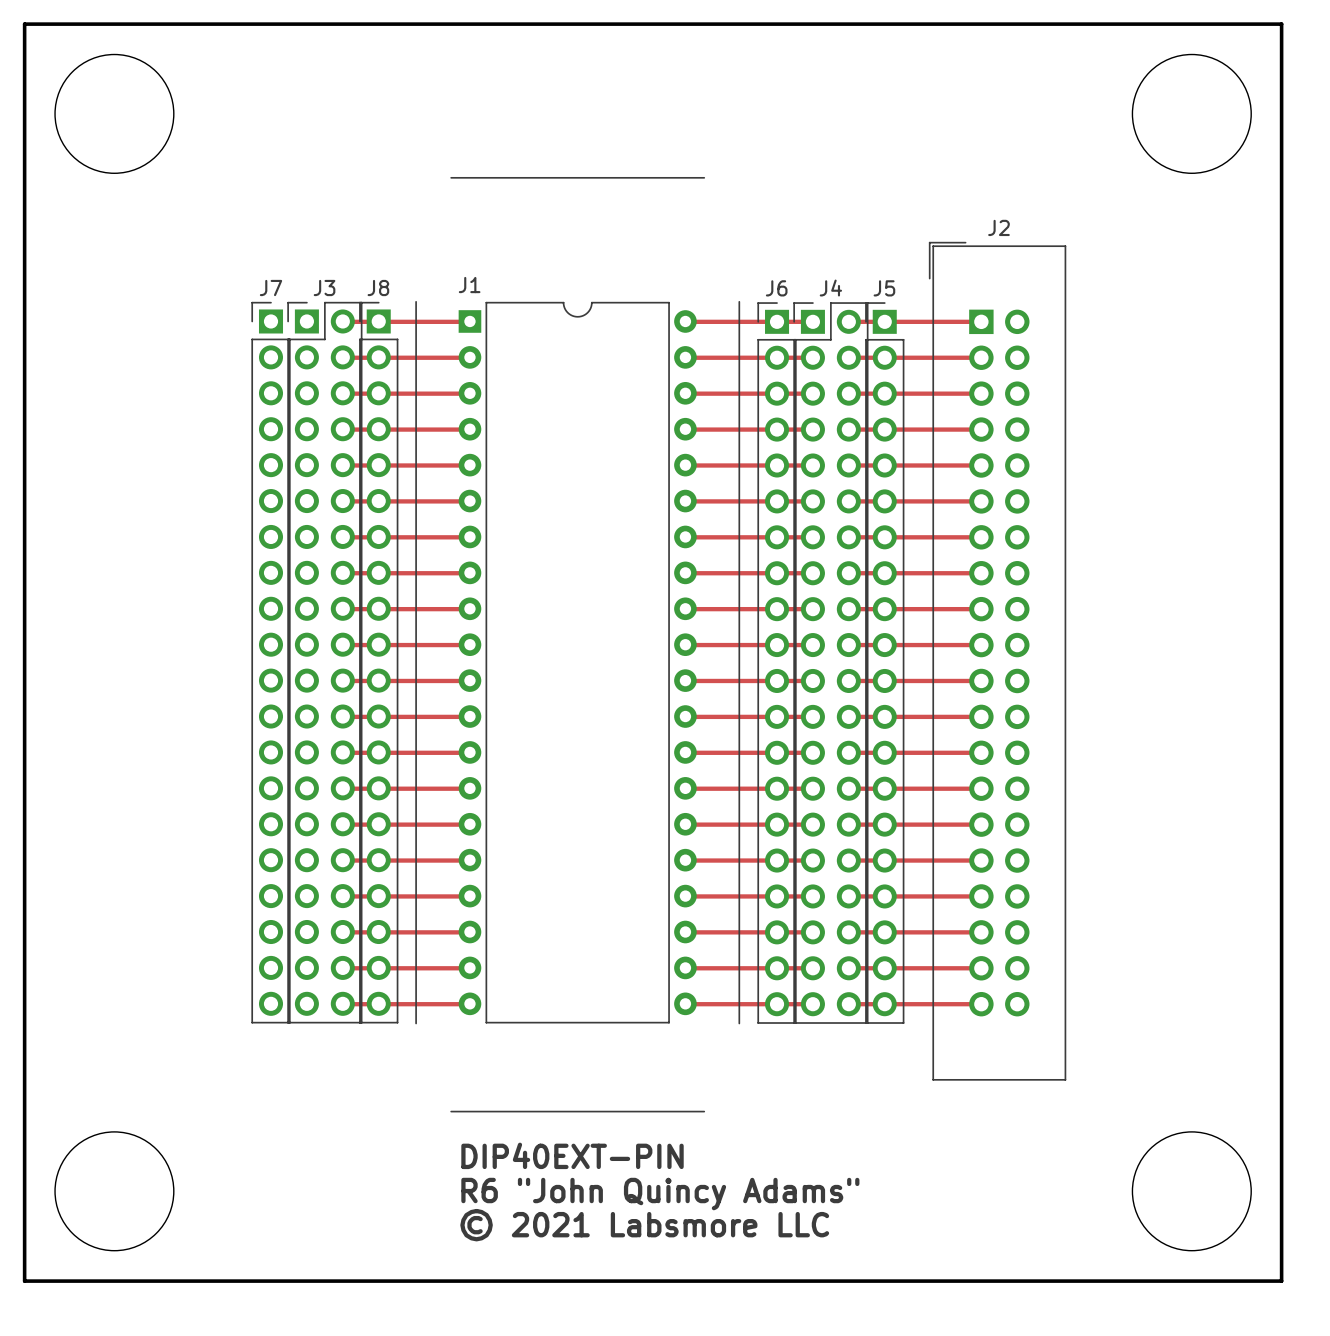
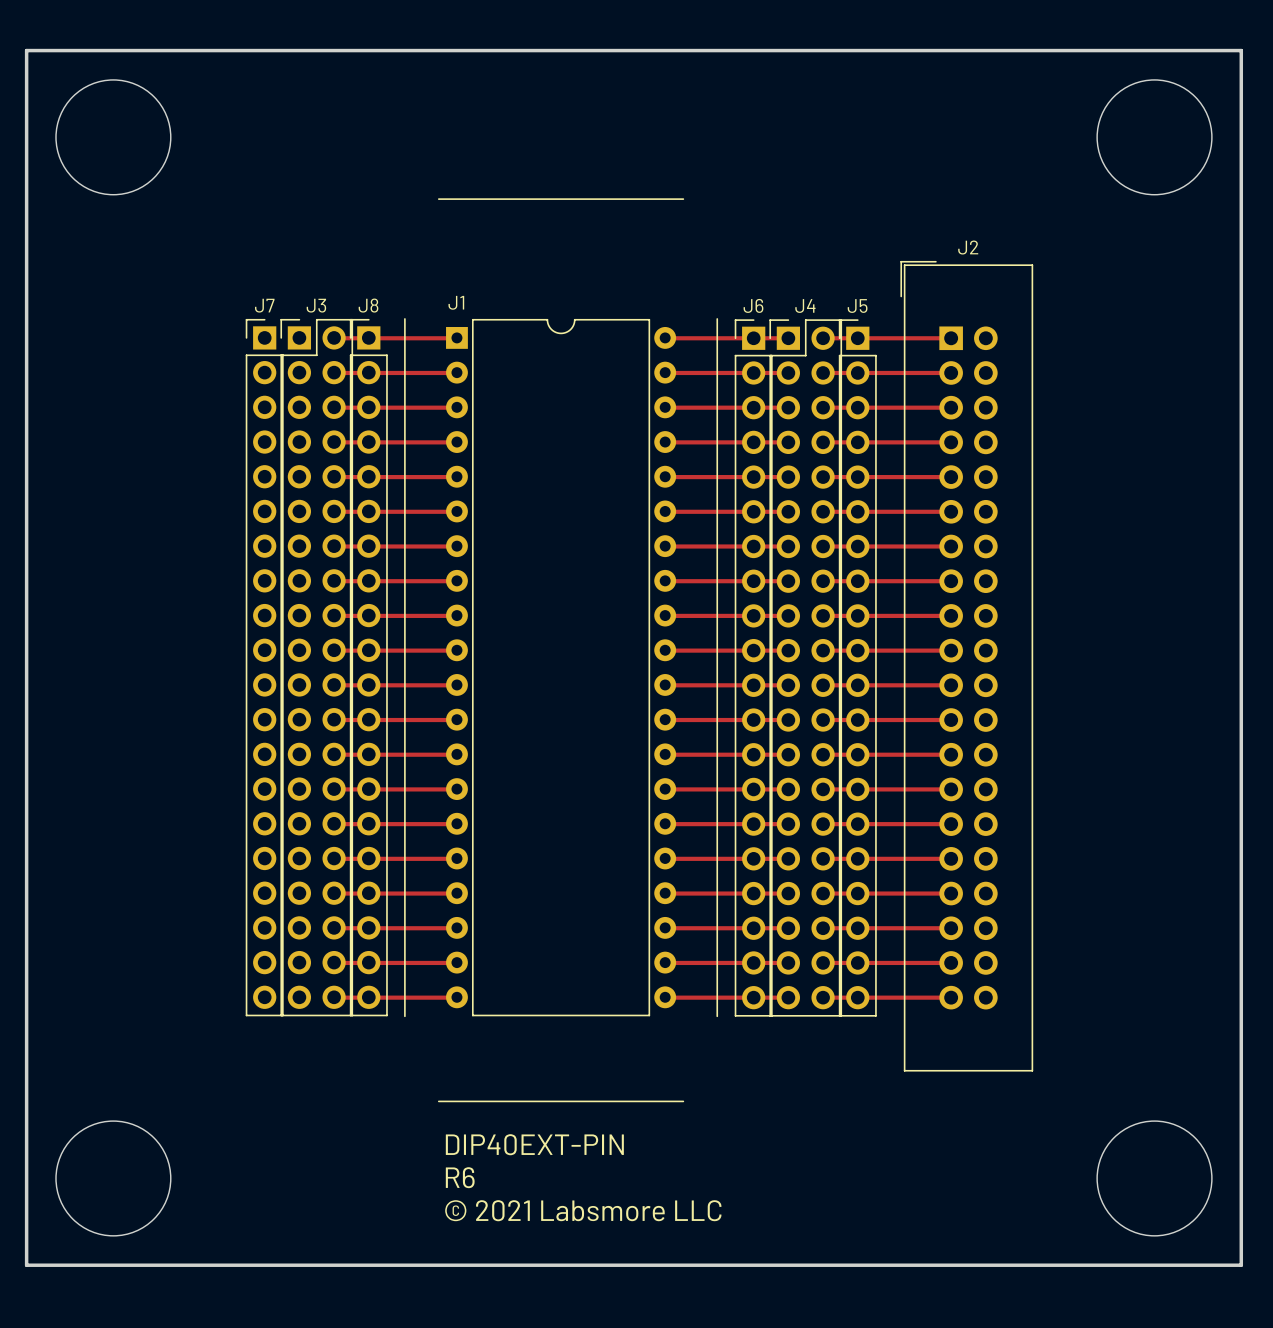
text: R6 "John Quincy Adams" (660, 1194) -> R6 (460, 1177)

